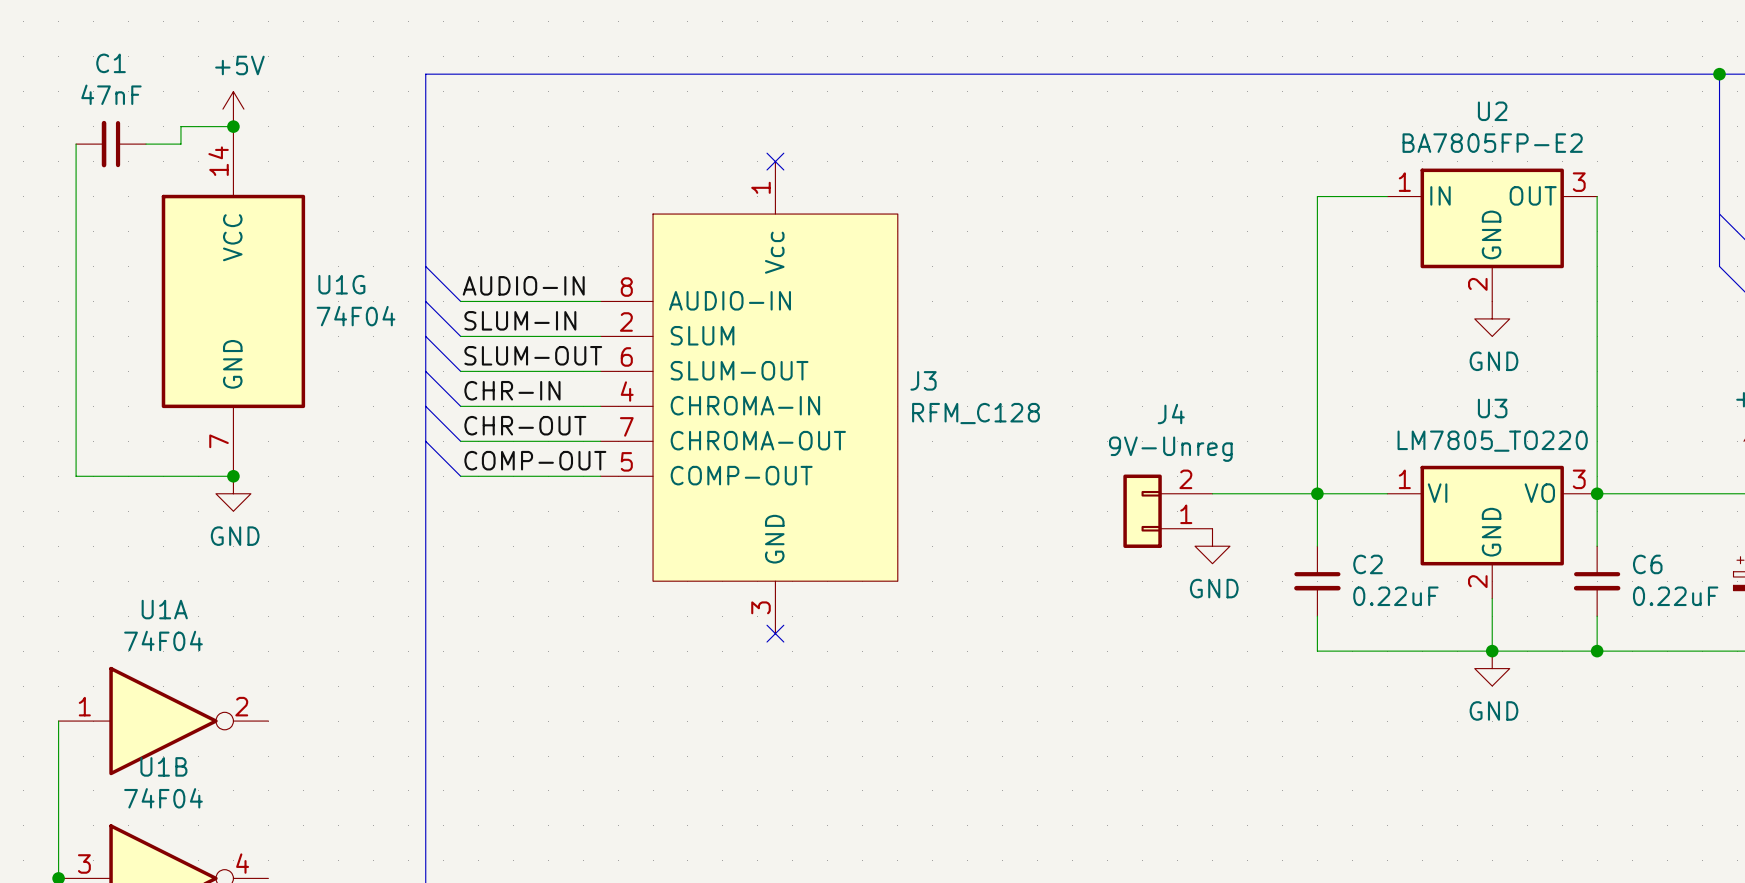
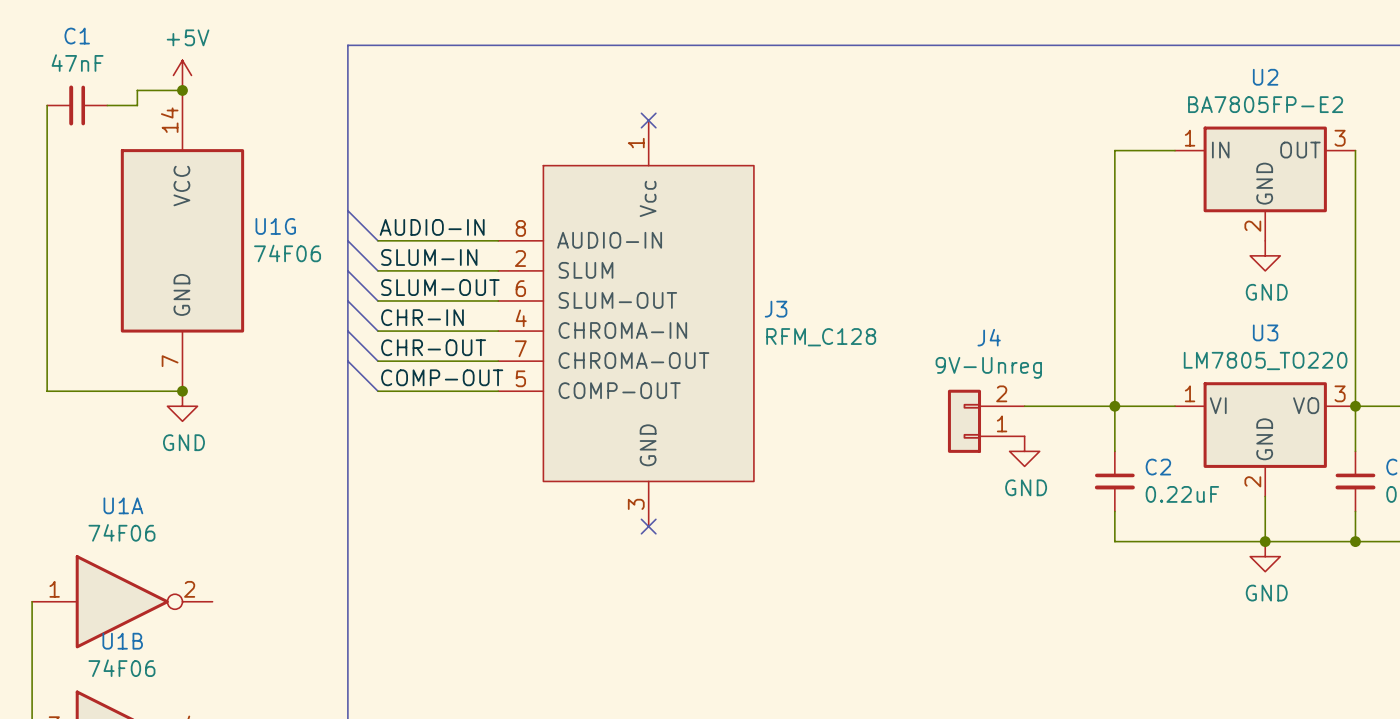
U1G value: 74F04 (356, 316) -> 74F06 (287, 253)
U1A value: 74F04 (163, 640) -> 74F06 (121, 532)
U1B value: 74F04 (163, 798) -> 74F06 (121, 668)

